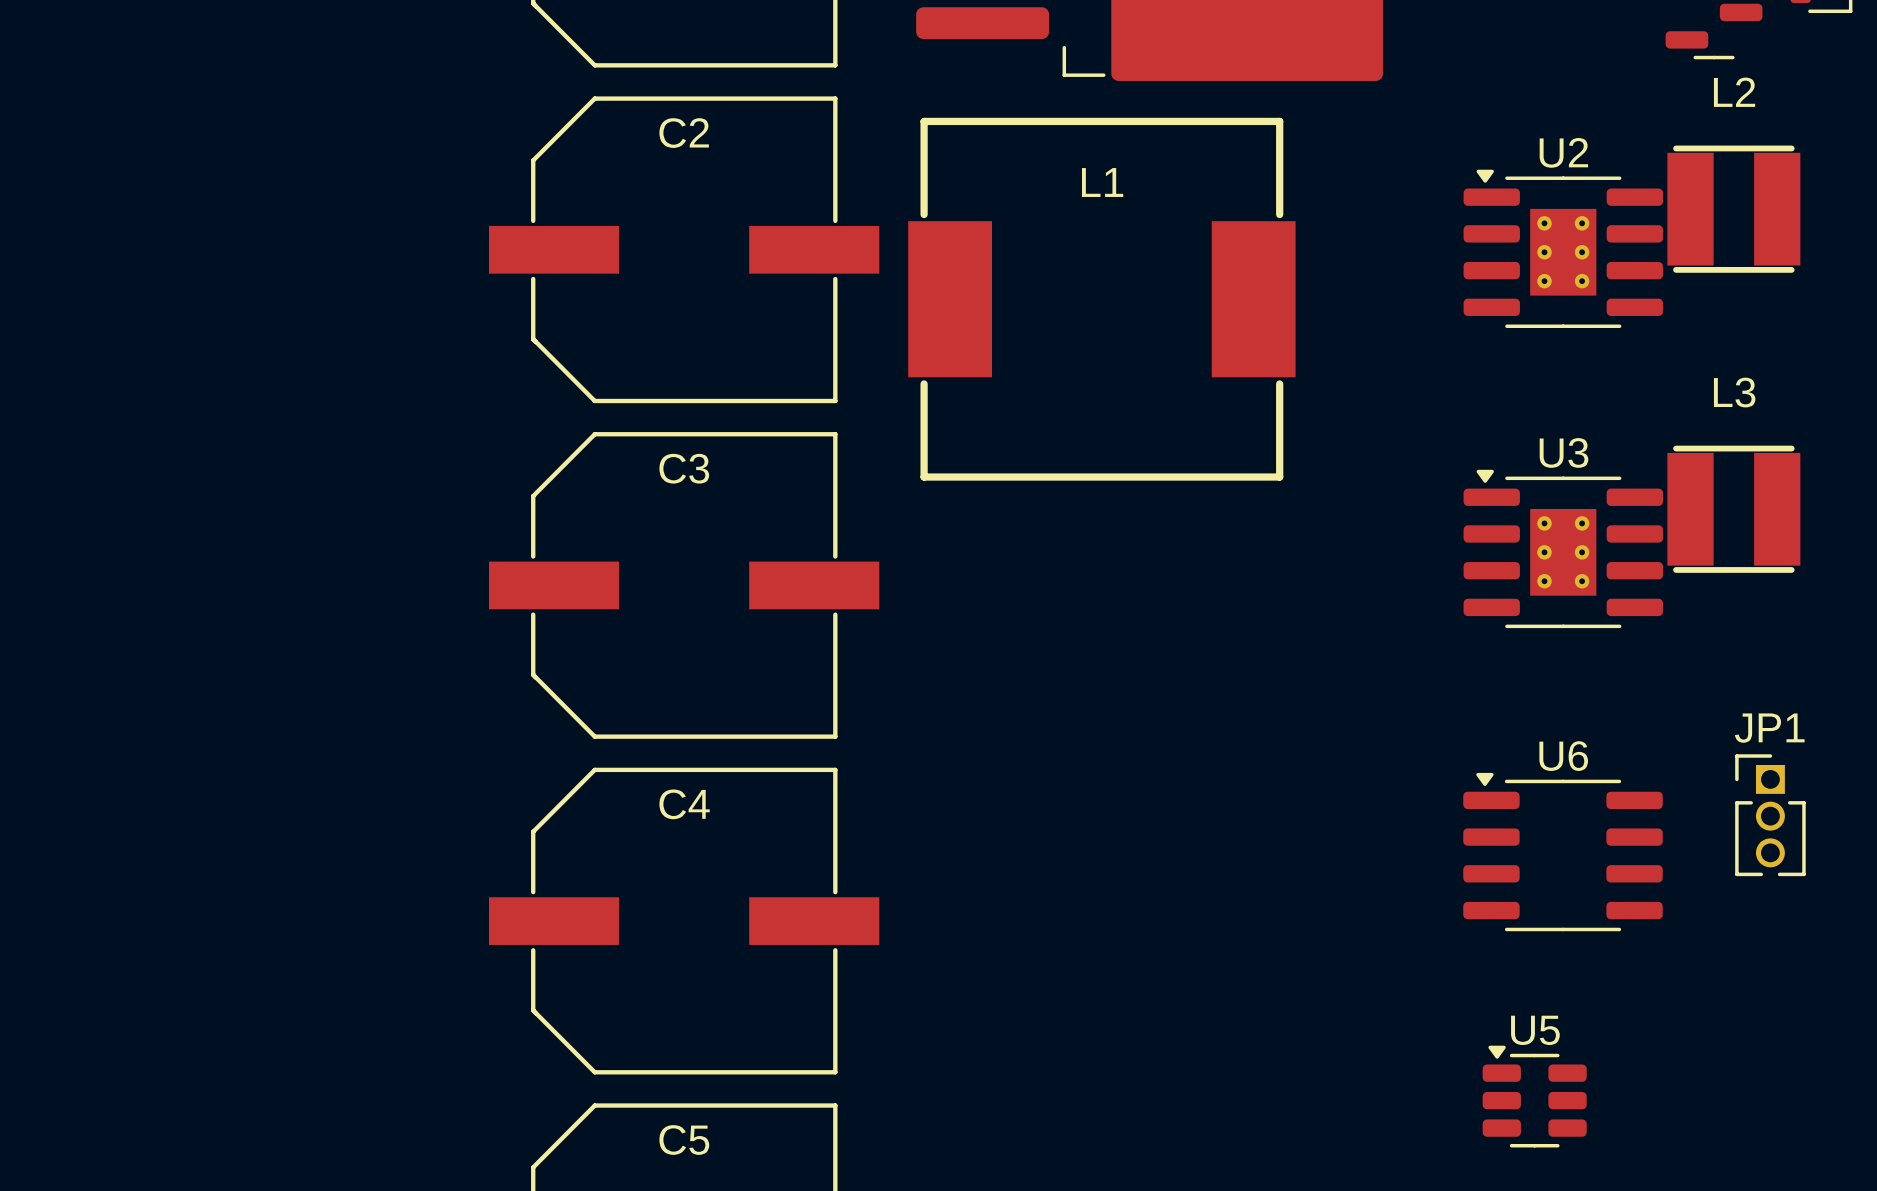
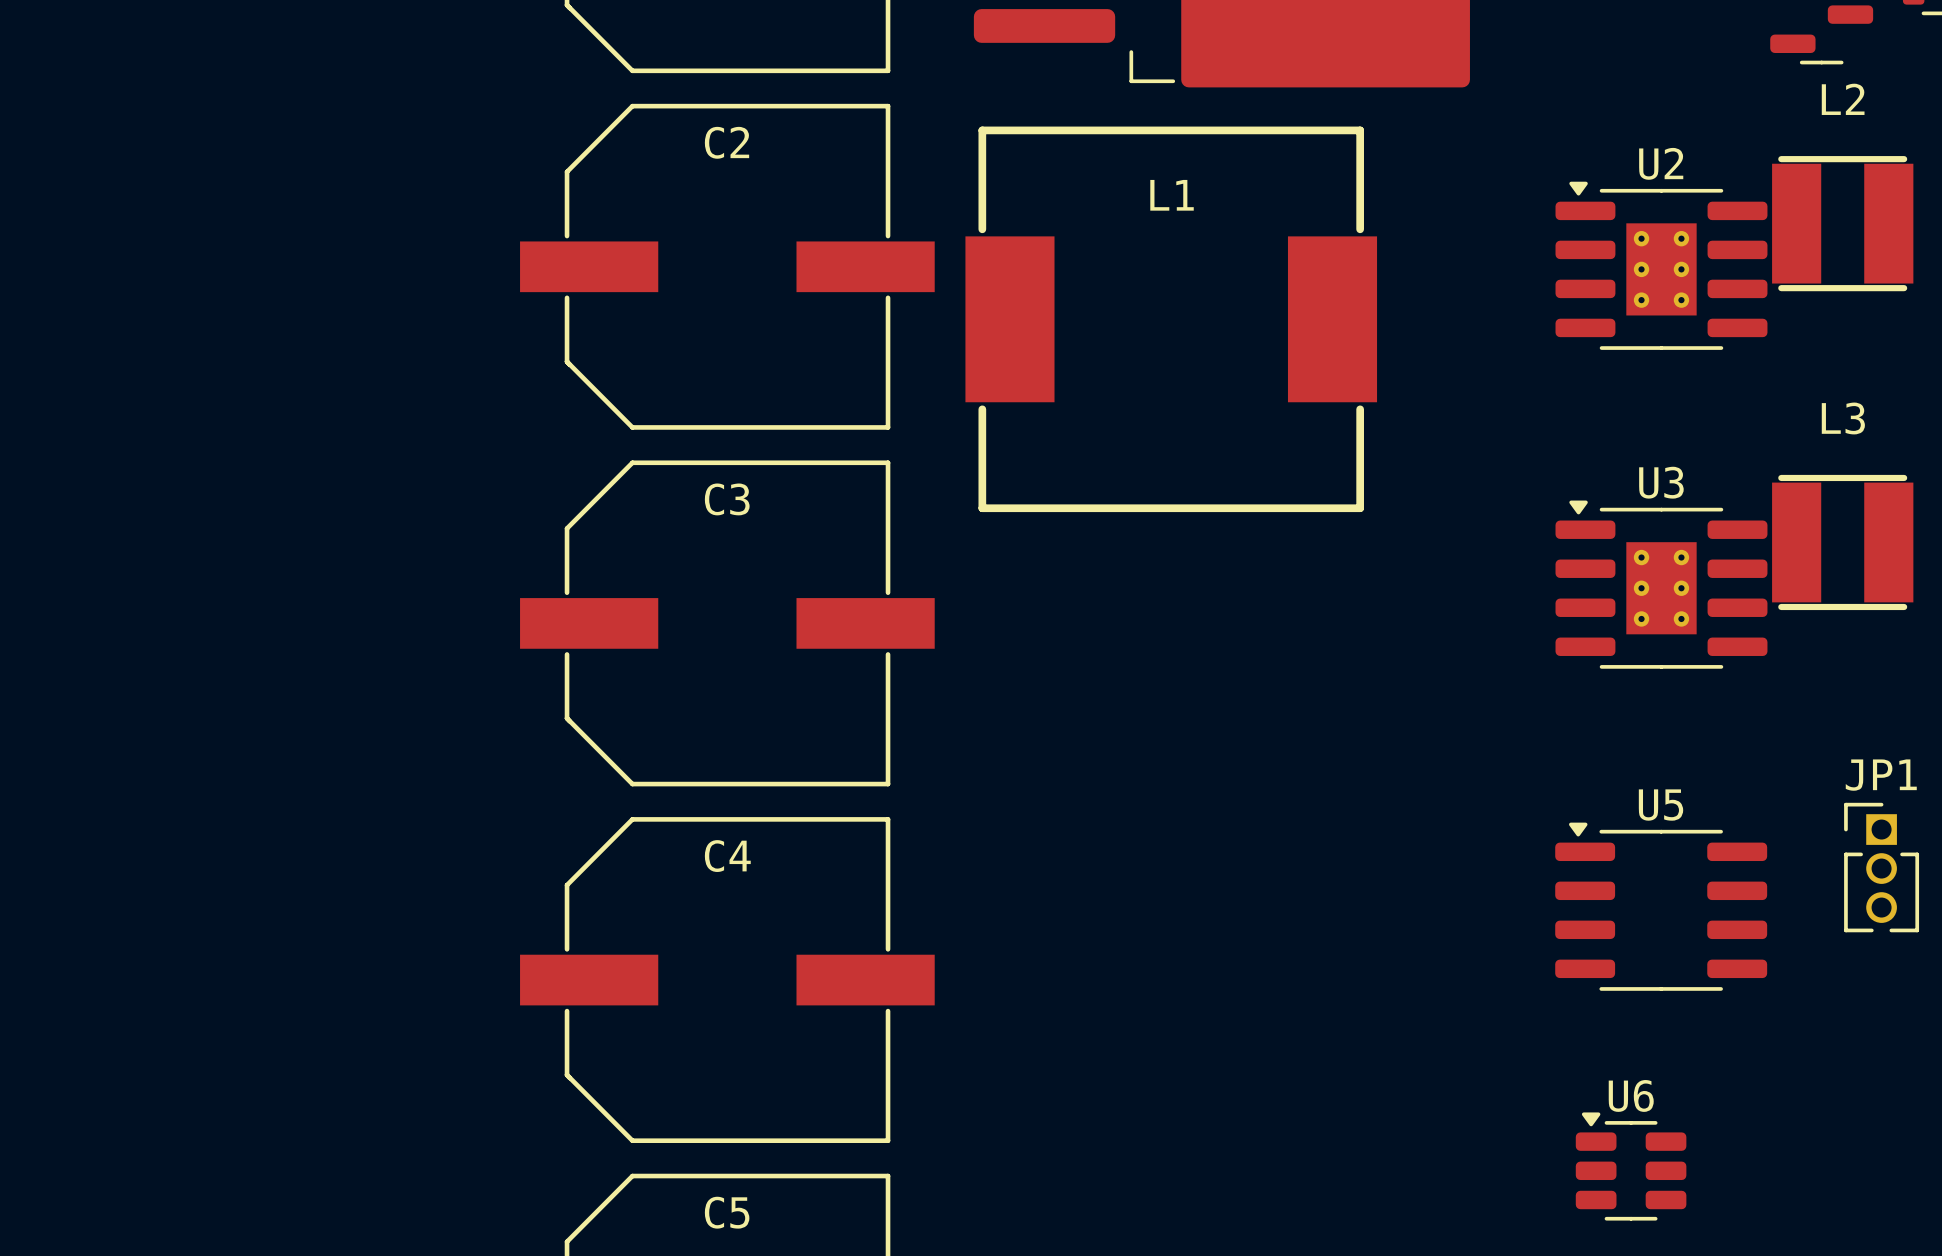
U6 name: U6 (1563, 756) -> U5 (1661, 805)
U5 name: U5 (1535, 1030) -> U6 (1631, 1095)

